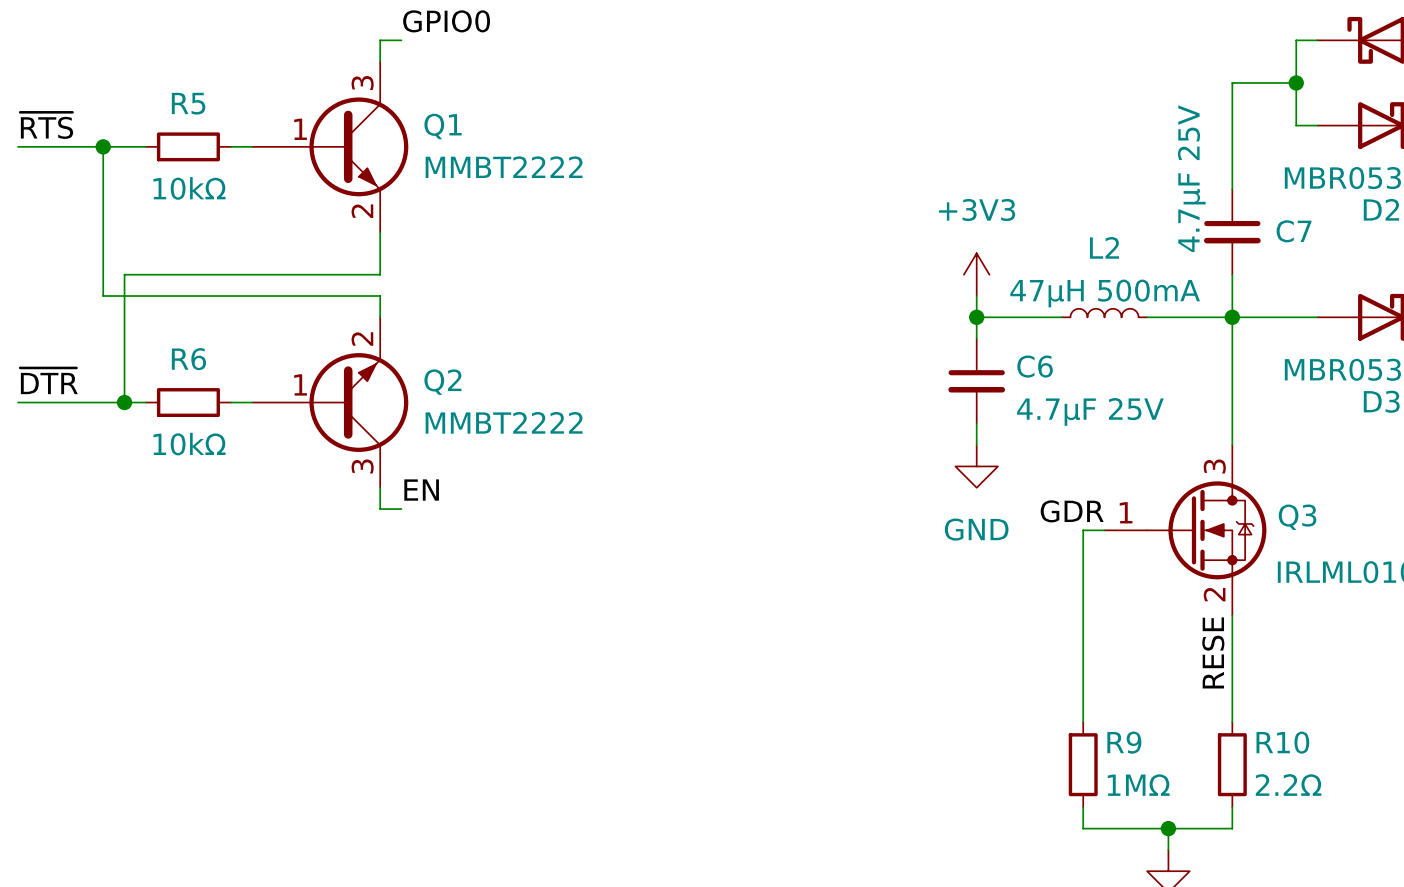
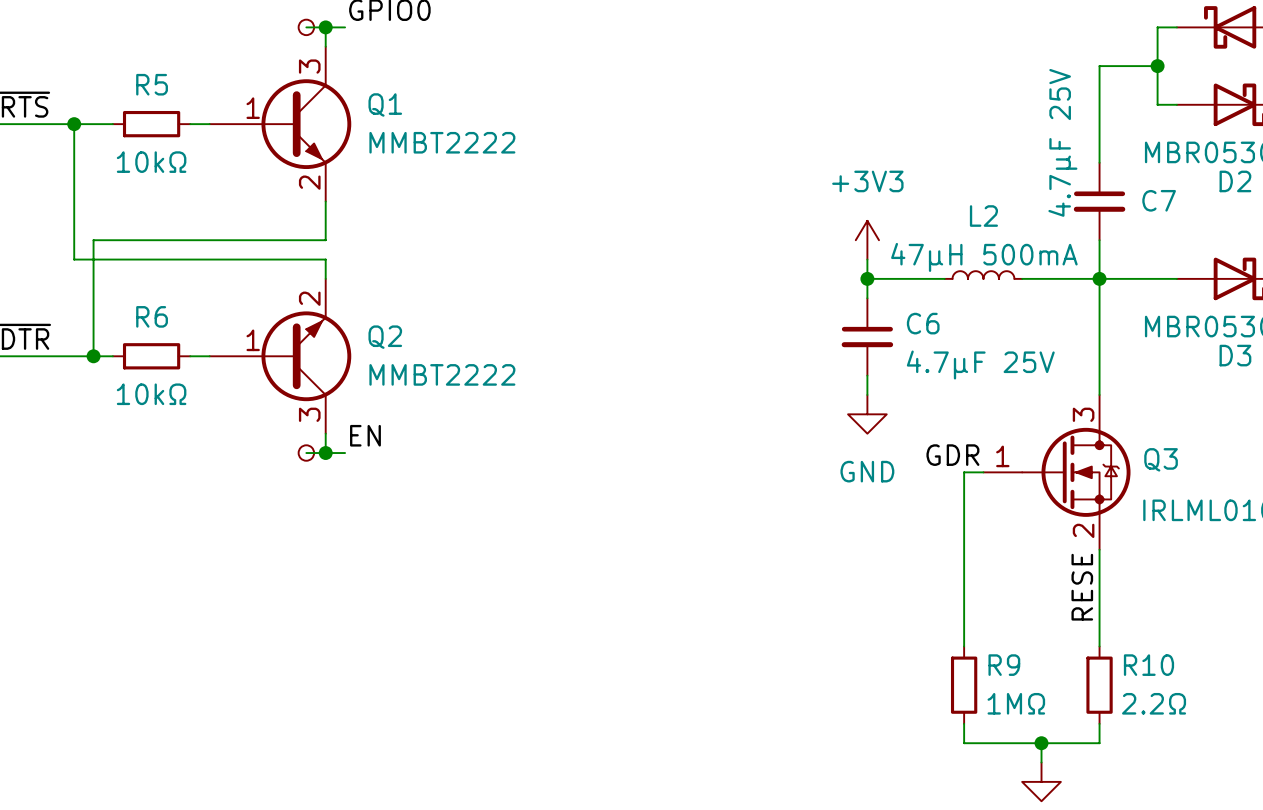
wire: none -> (306, 27) (325, 27)
part: none -> (306, 27)
junction: none -> (325, 27)
wire: none -> (306, 453) (325, 453)
part: none -> (306, 453)
junction: none -> (325, 453)

